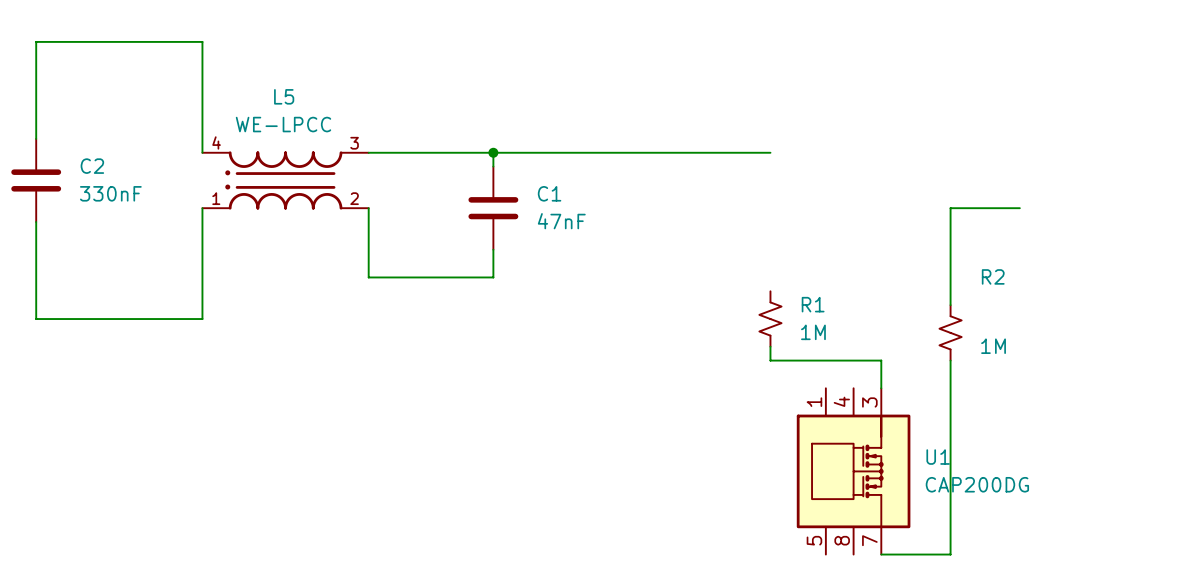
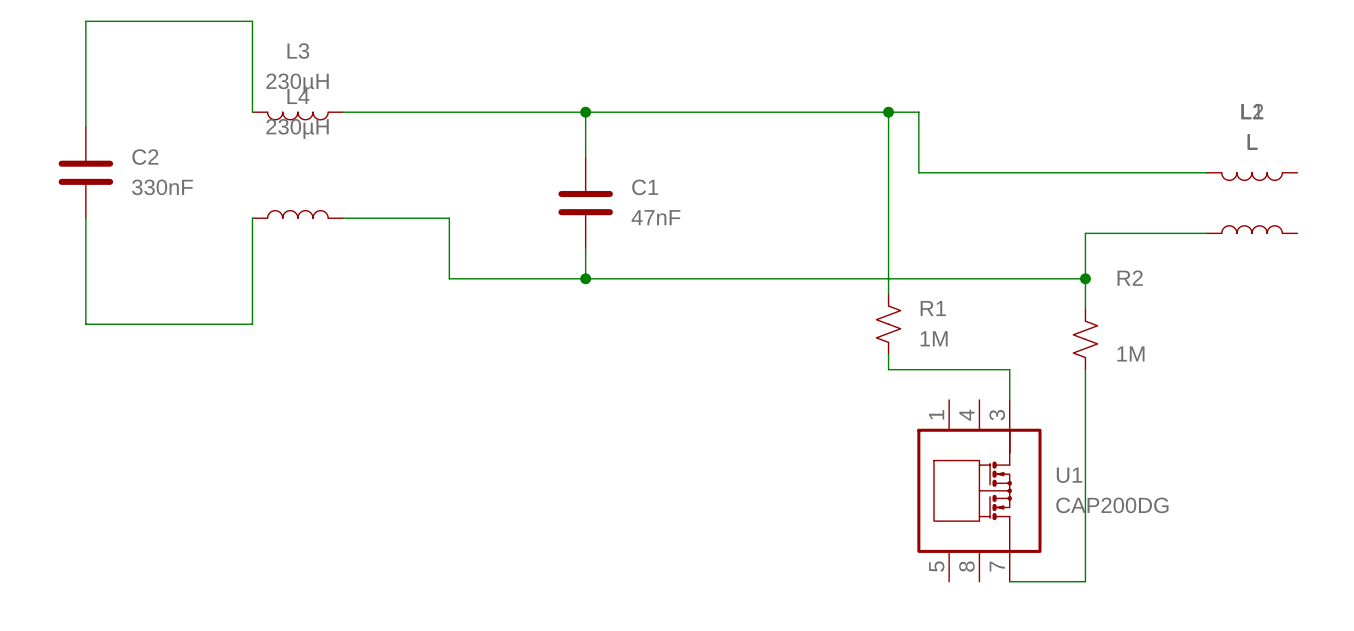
wire: (188, 41) (202, 41) (202, 152) -> (252, 21) (252, 112)
wire: none -> (343, 112) (918, 112) (918, 172) (1206, 172)
wire: none -> (585, 112) (585, 142)
wire: none -> (888, 112) (888, 293)
junction: none -> (888, 112)
L3: none -> 230µH (297, 115)
wire: (368, 152) (770, 152) -> none
junction position: (493, 152) -> (585, 112)
L5: WE-LPCC (285, 180) -> none
part: none -> L (1252, 176)
wire: (202, 208) (202, 319) (188, 319) -> (252, 218) (252, 324)
wire: (368, 208) (368, 222) -> (343, 218) (449, 218)
wire: (1019, 208) (950, 208) (950, 235) -> (1206, 233) (1085, 233)
L4: none -> 230µH (297, 214)
part: none -> L (1252, 229)
wire: none -> (585, 278) (1085, 278)
junction: none -> (585, 278)
junction: none -> (1085, 278)

